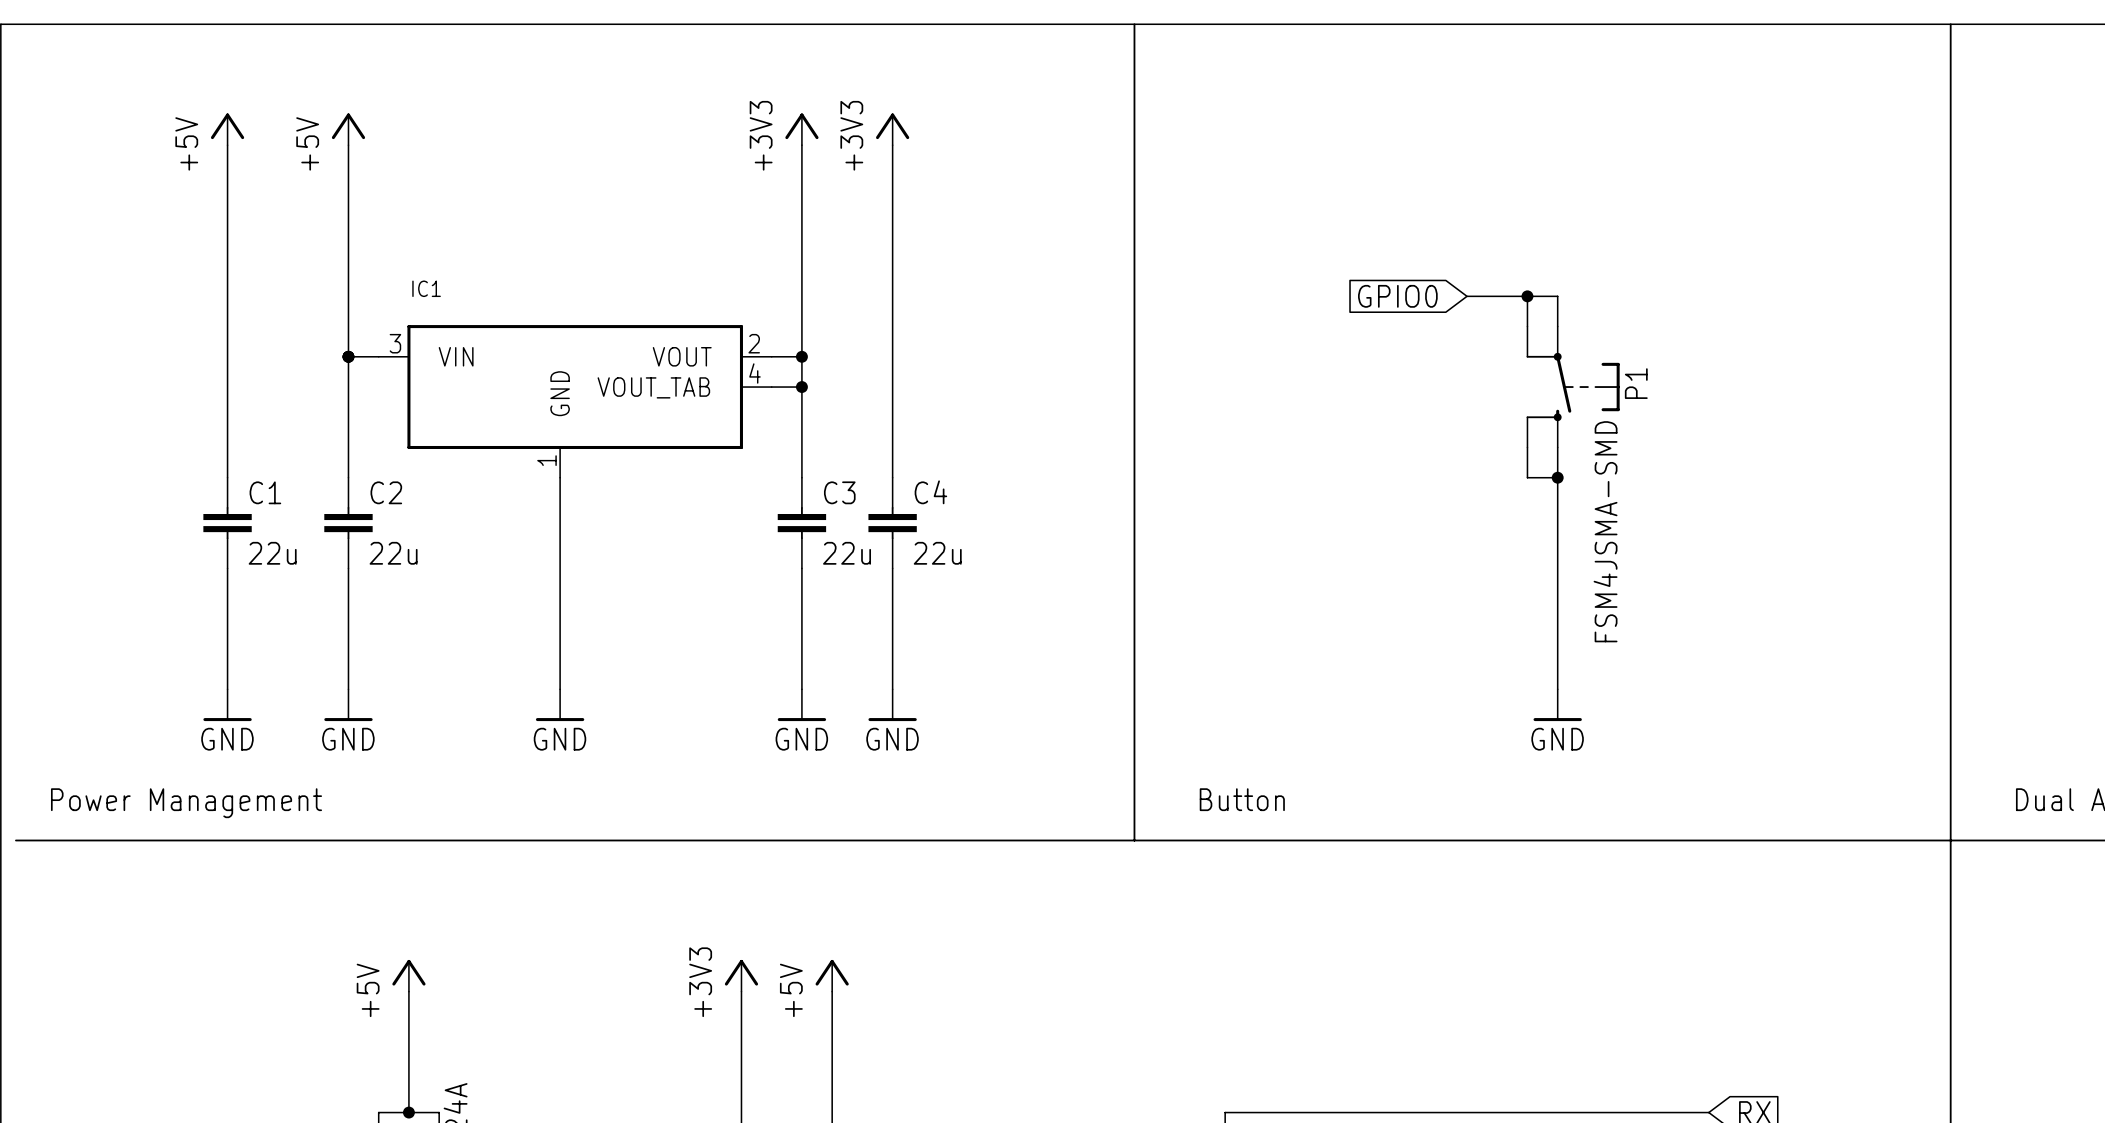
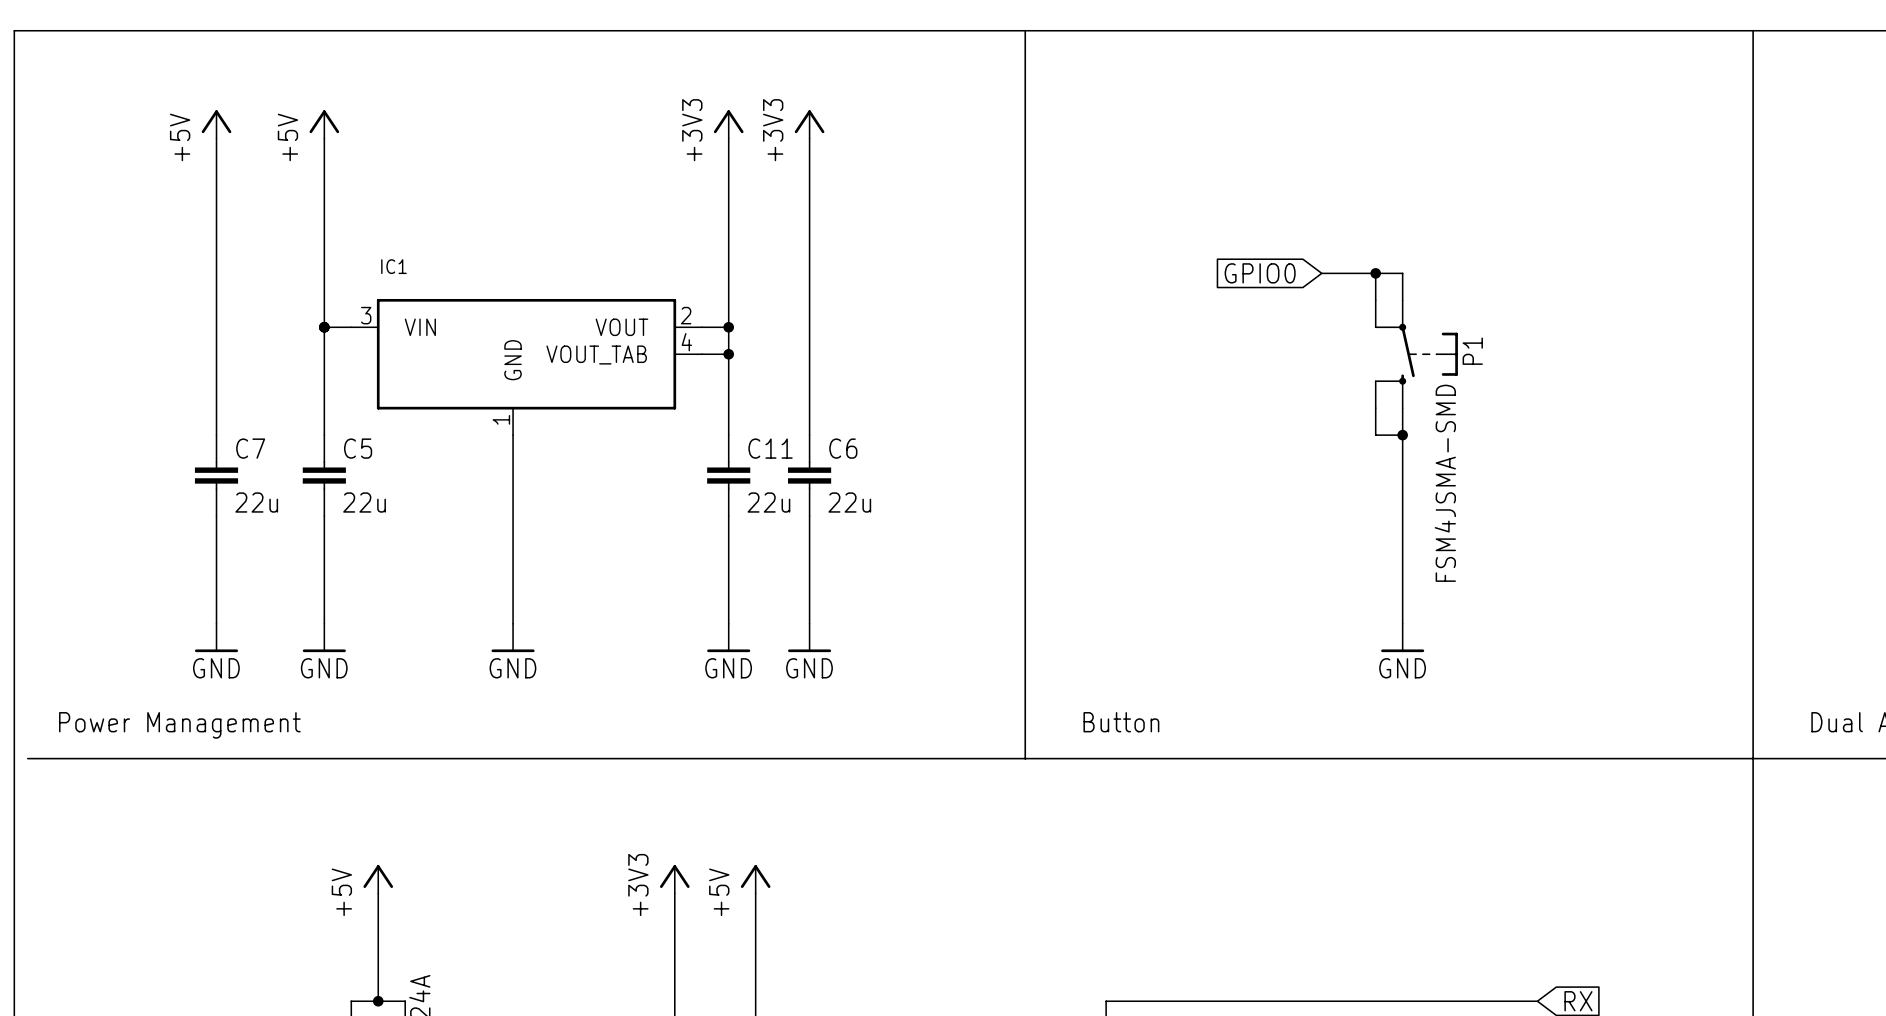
C1 name: C1 (265, 492) -> C7 (250, 448)
C2 name: C2 (386, 492) -> C5 (358, 448)
C3 name: C3 (839, 492) -> C11 (770, 448)
C4 name: C4 (930, 492) -> C6 (843, 448)

